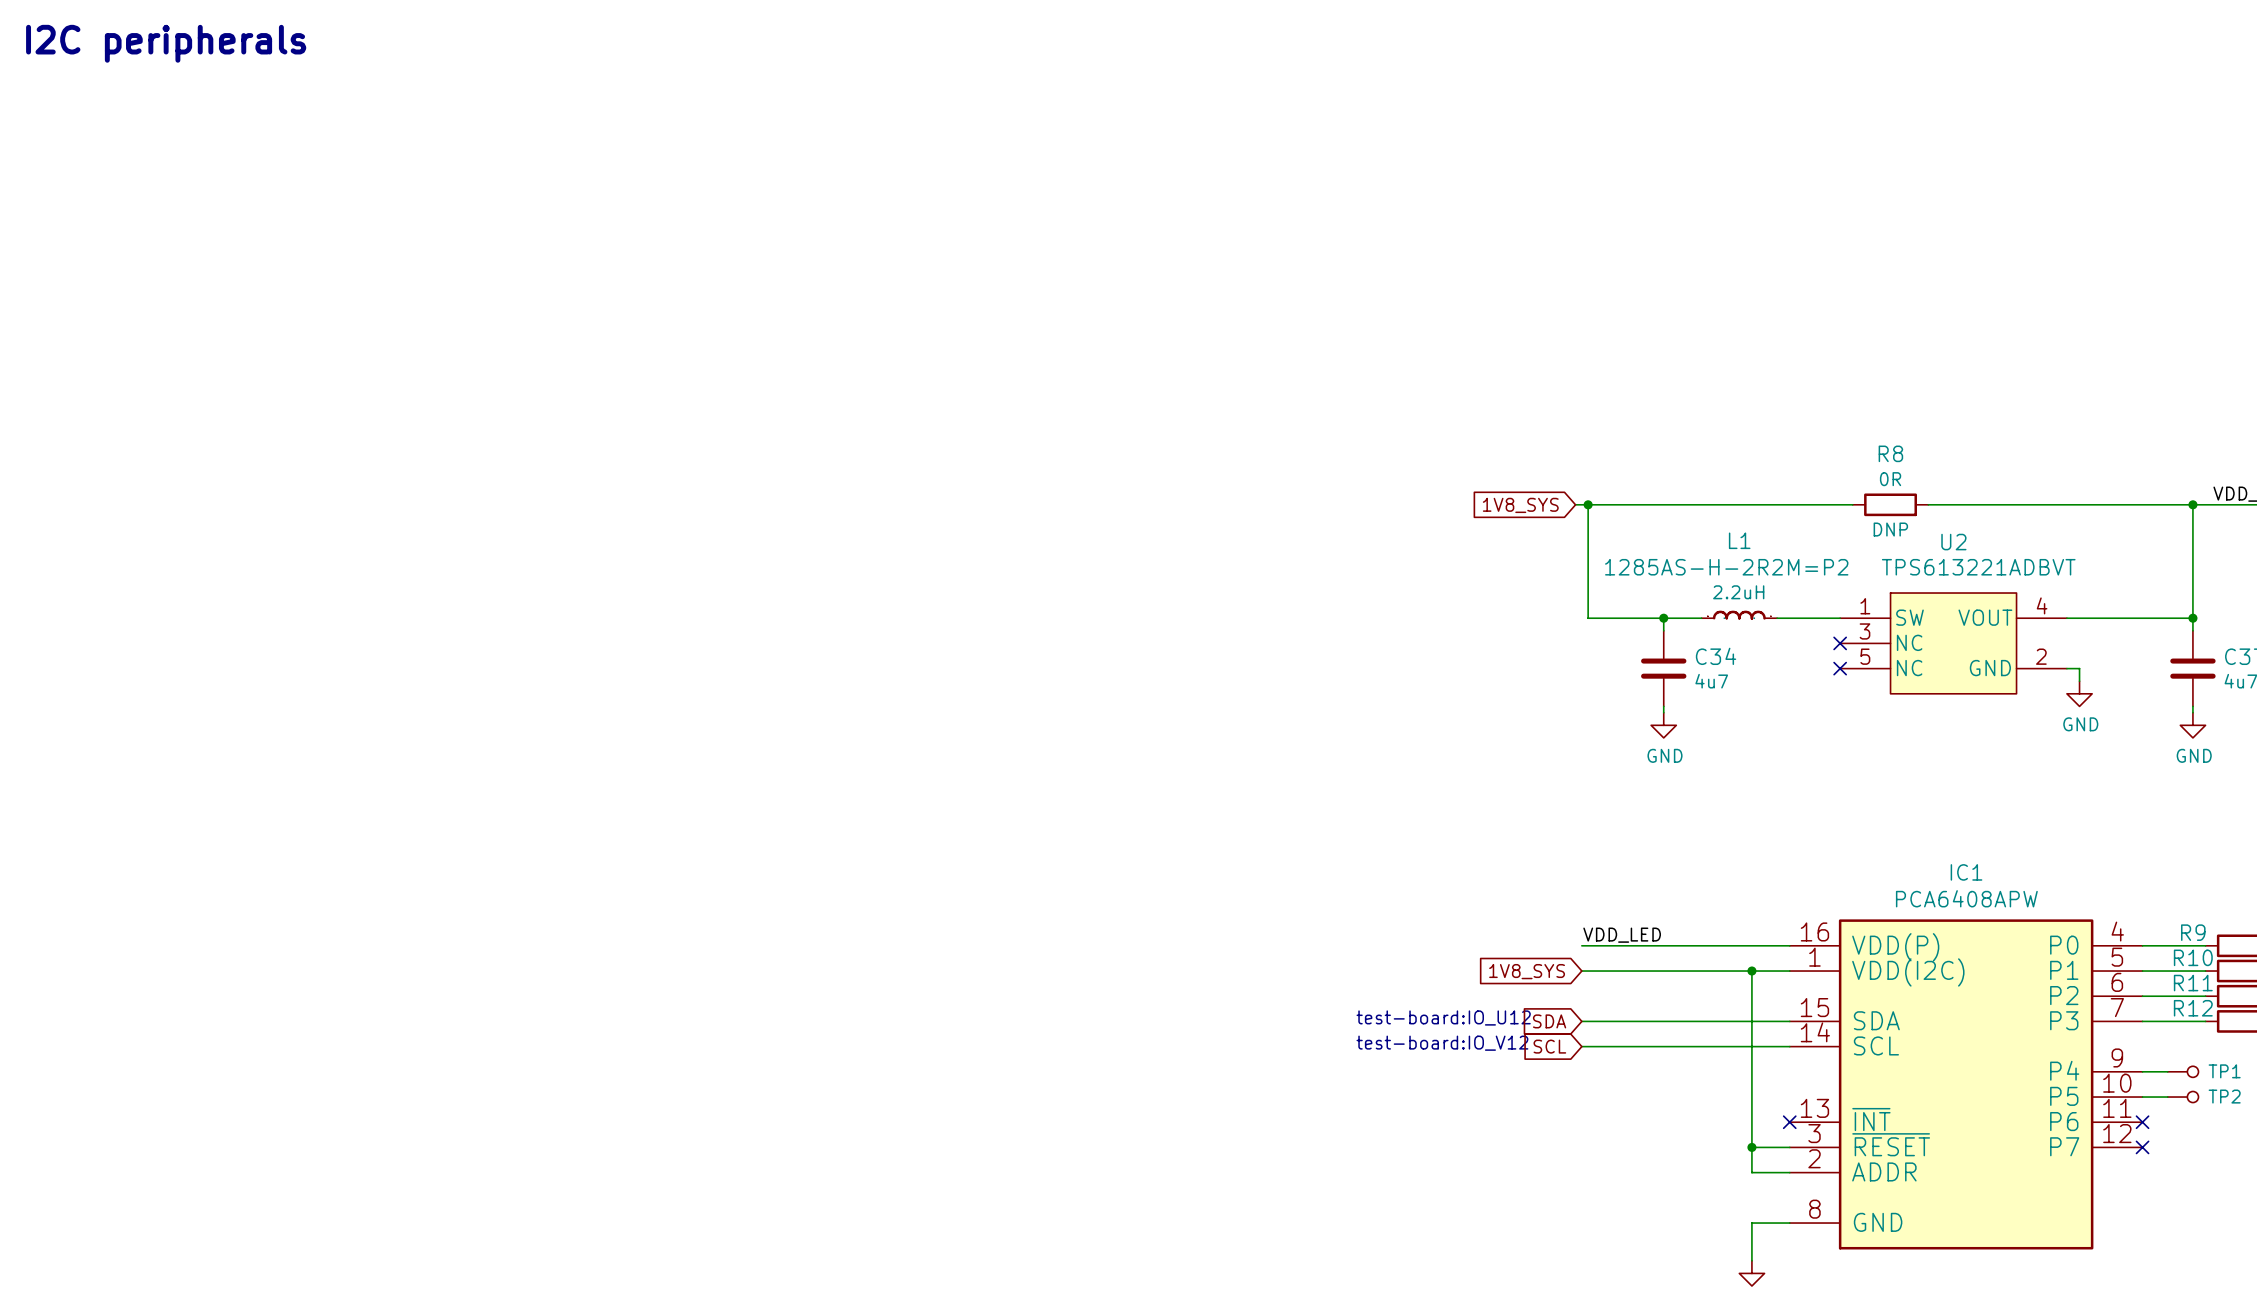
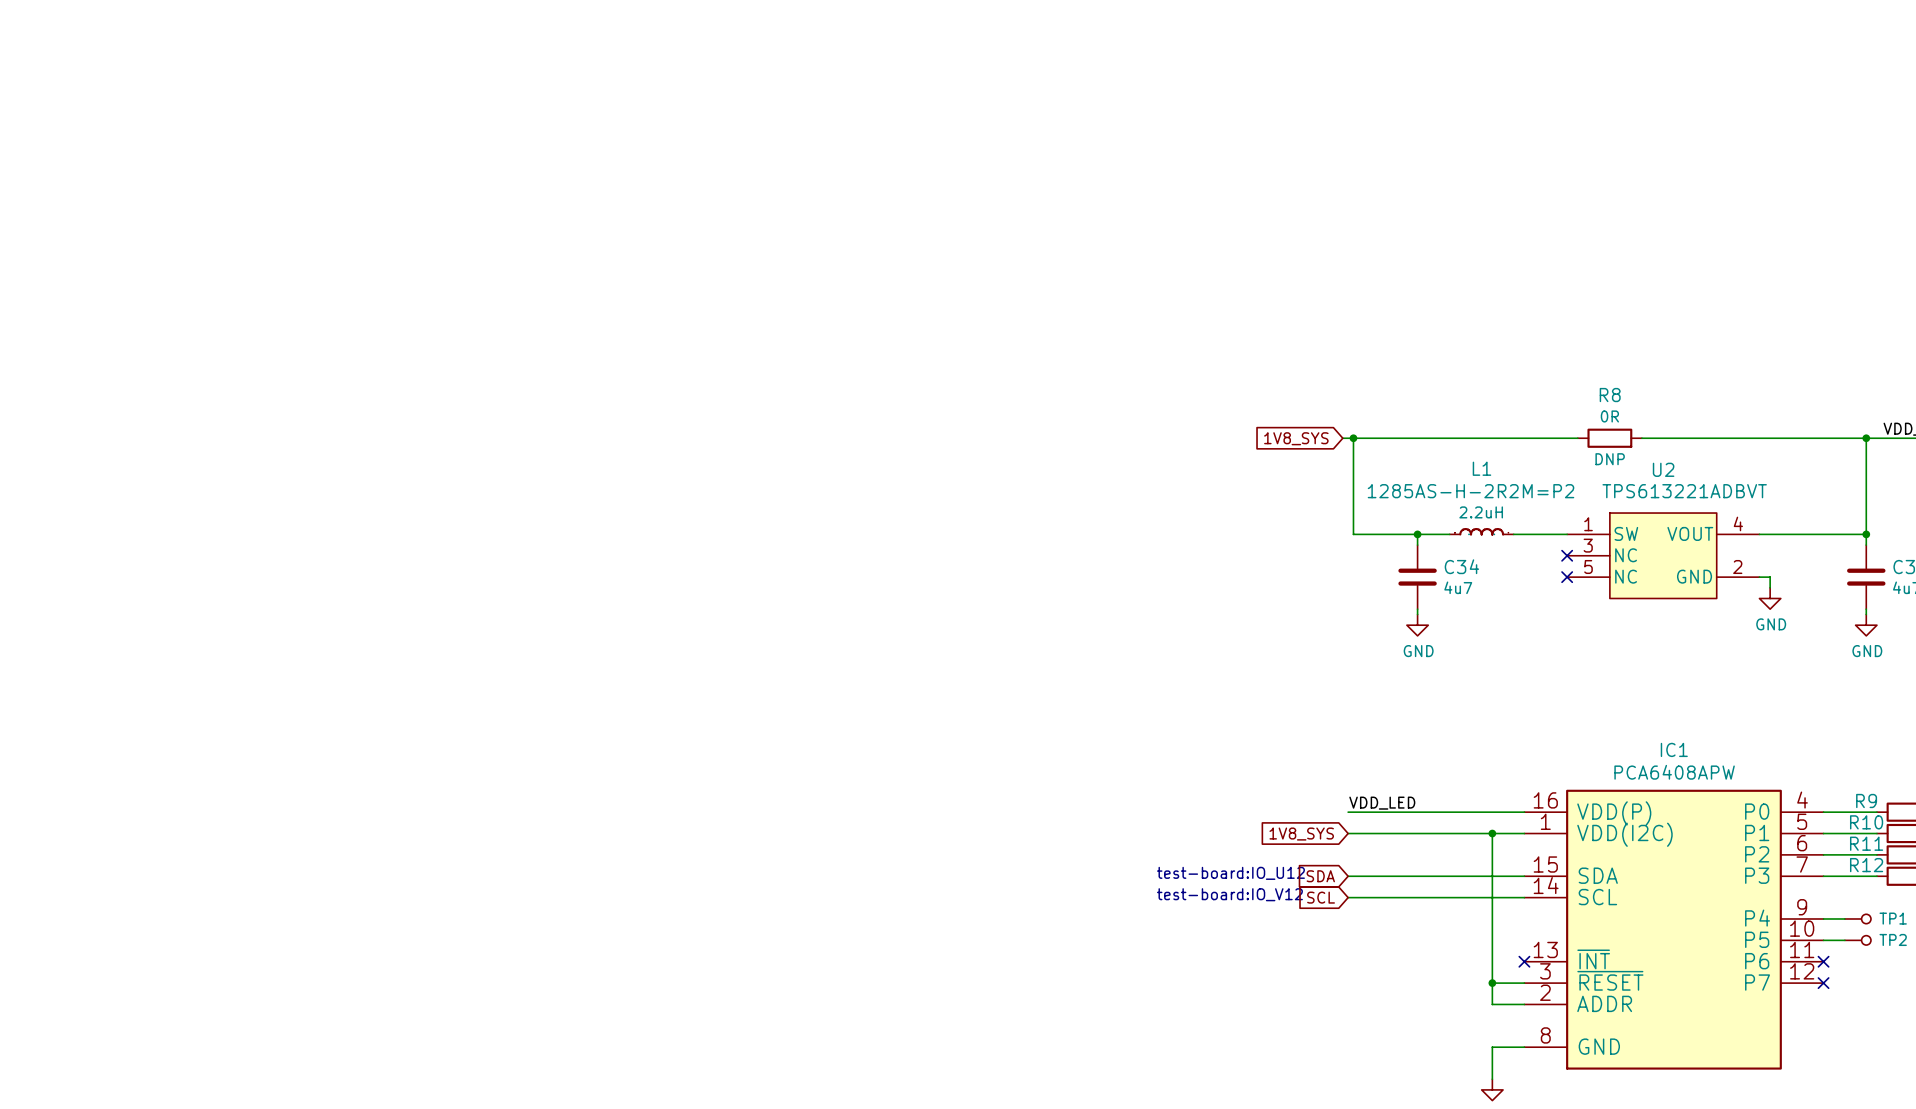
text: I2C peripherals (166, 43) -> none

